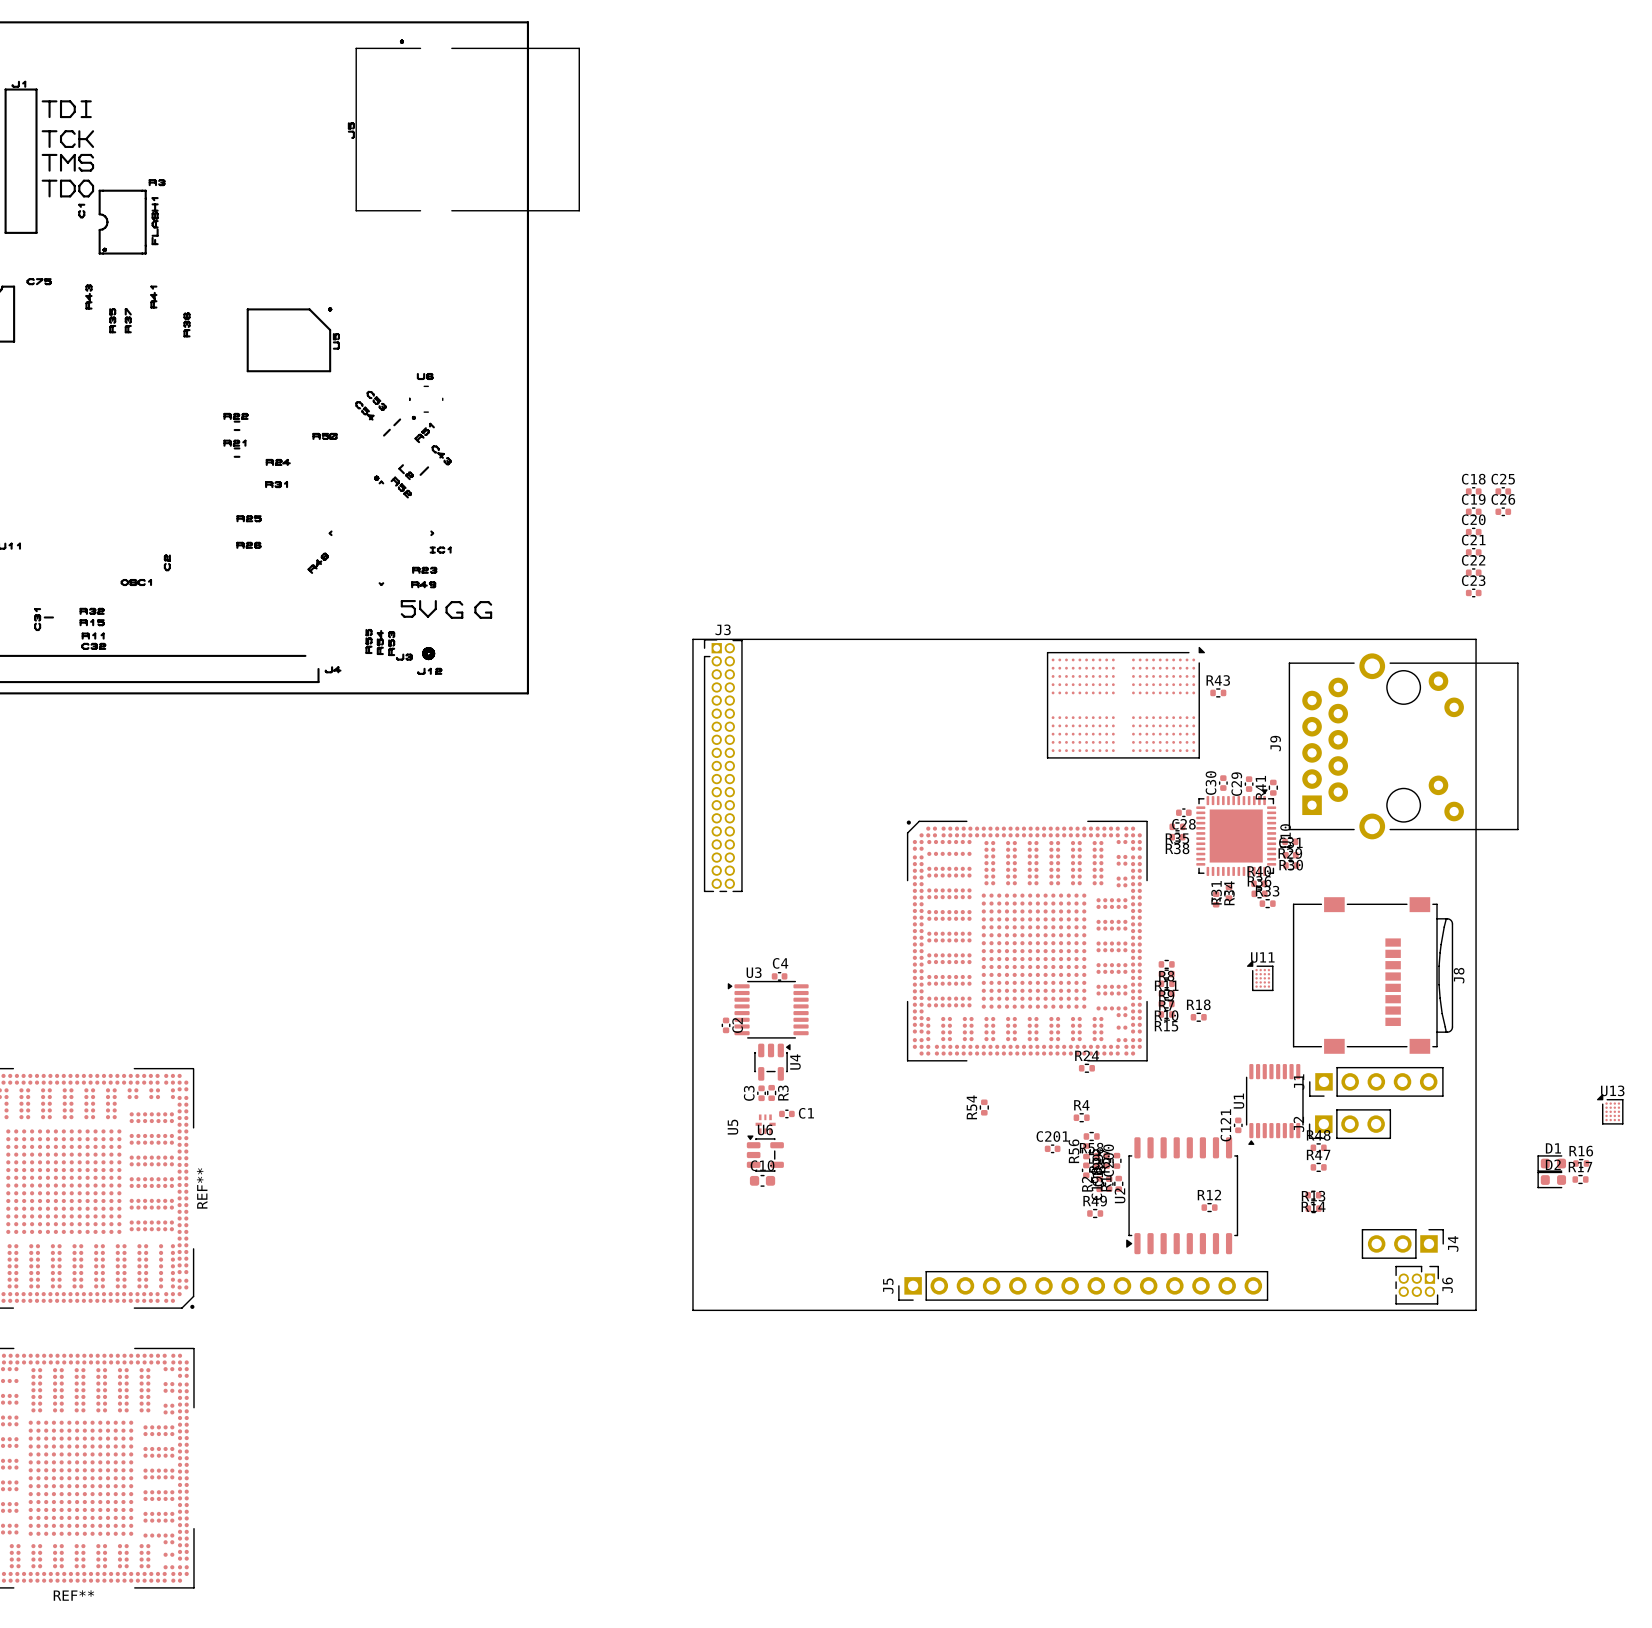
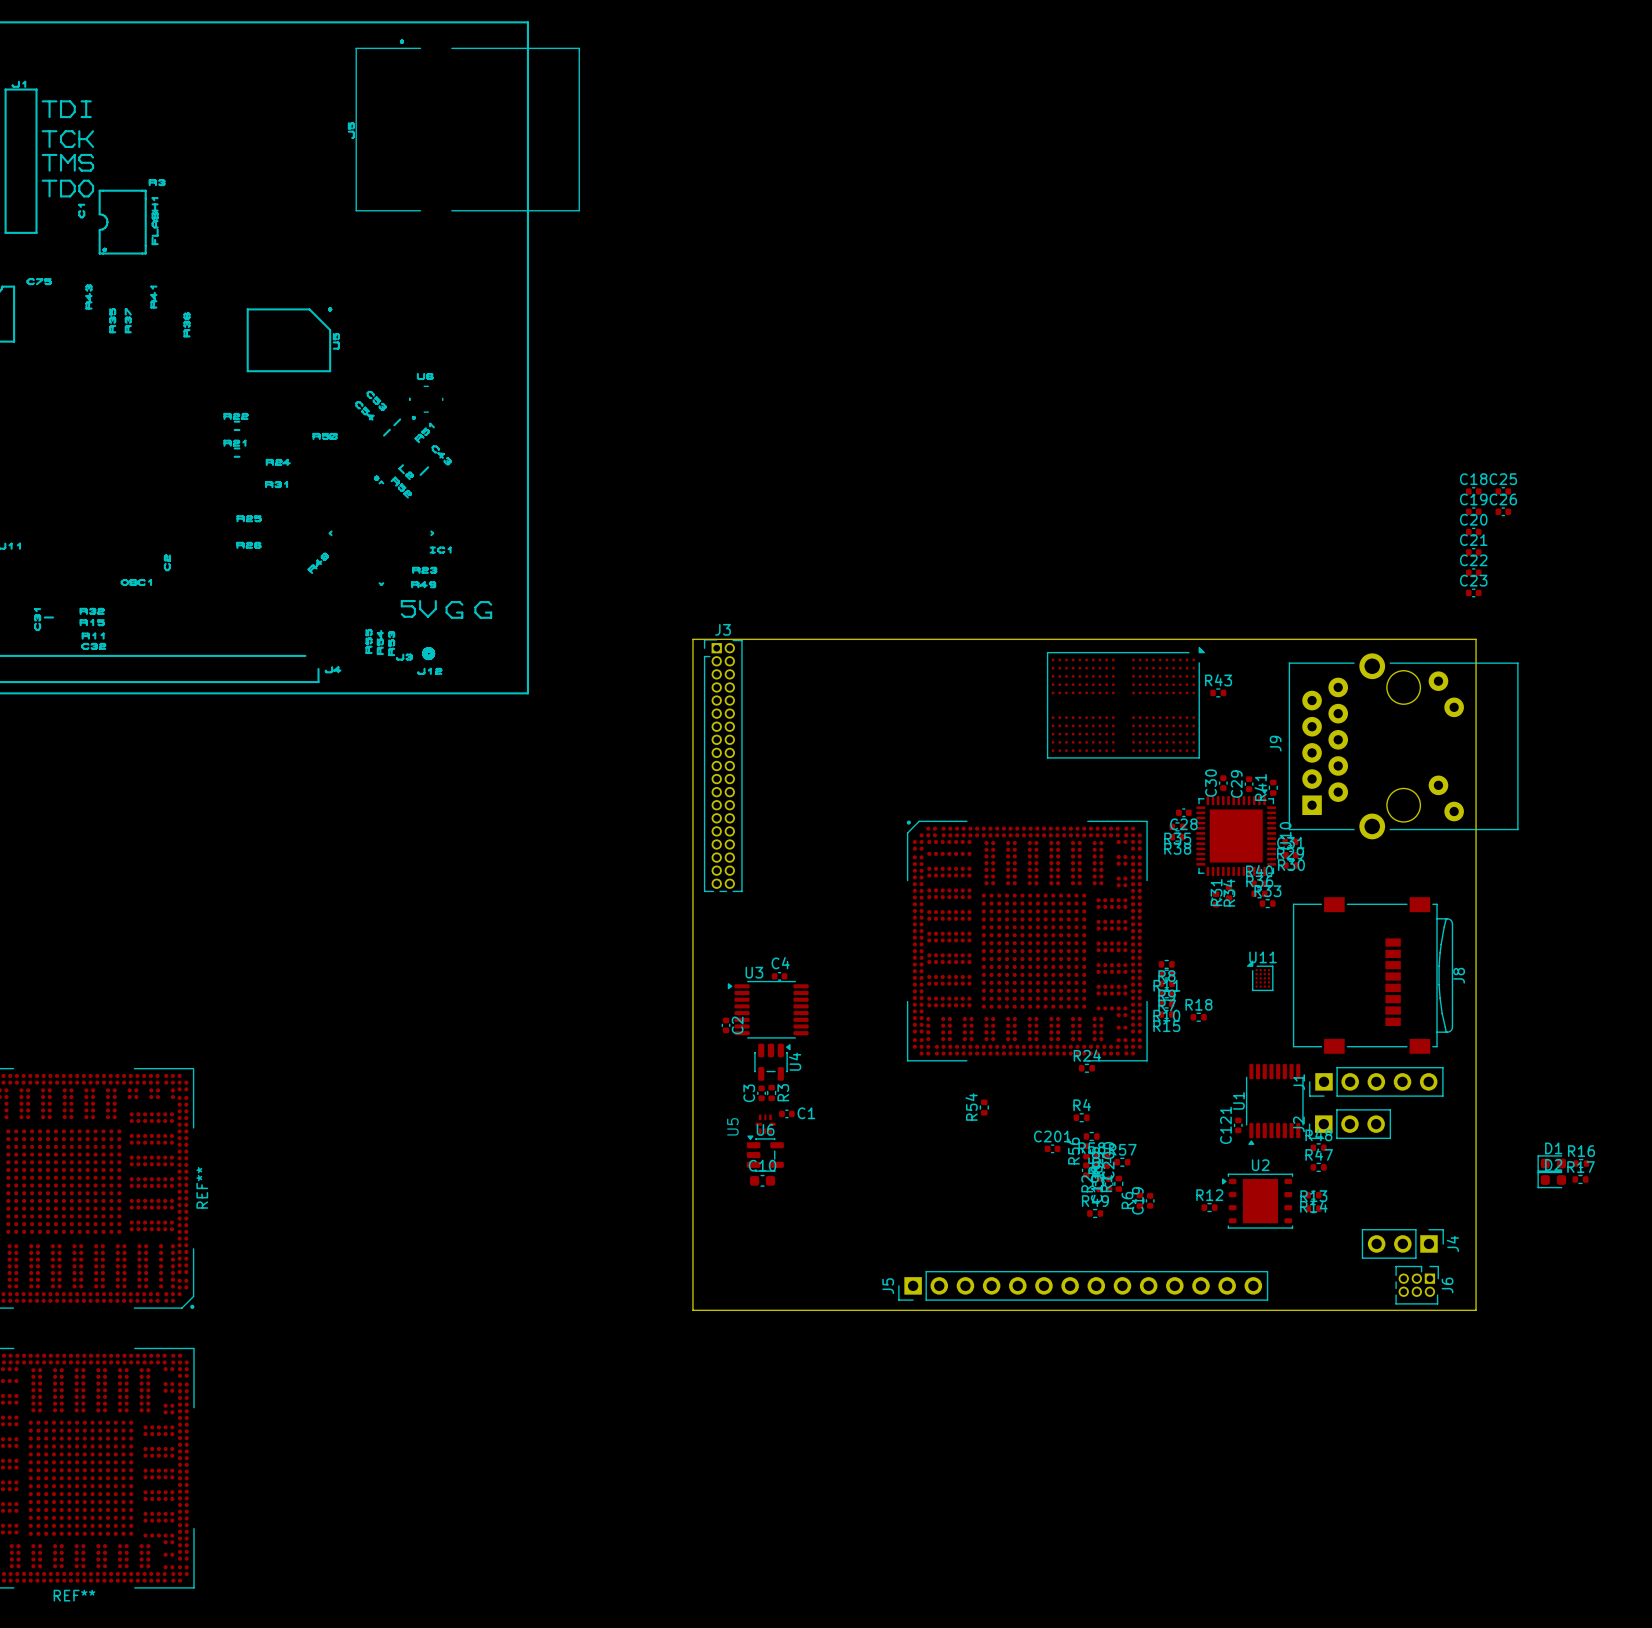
U13: (1610, 1109) -> none
U2 footprint: [1126, 1137, 1239, 1255] -> [1222, 1173, 1294, 1229]
R57 rotation: 0° (1116, 1160) -> 90° clockwise (1122, 1162)
U2 name position: U2 (1120, 1195) -> U2 (1260, 1165)
R6: none -> (1139, 1200)
C19: none -> (1150, 1200)

